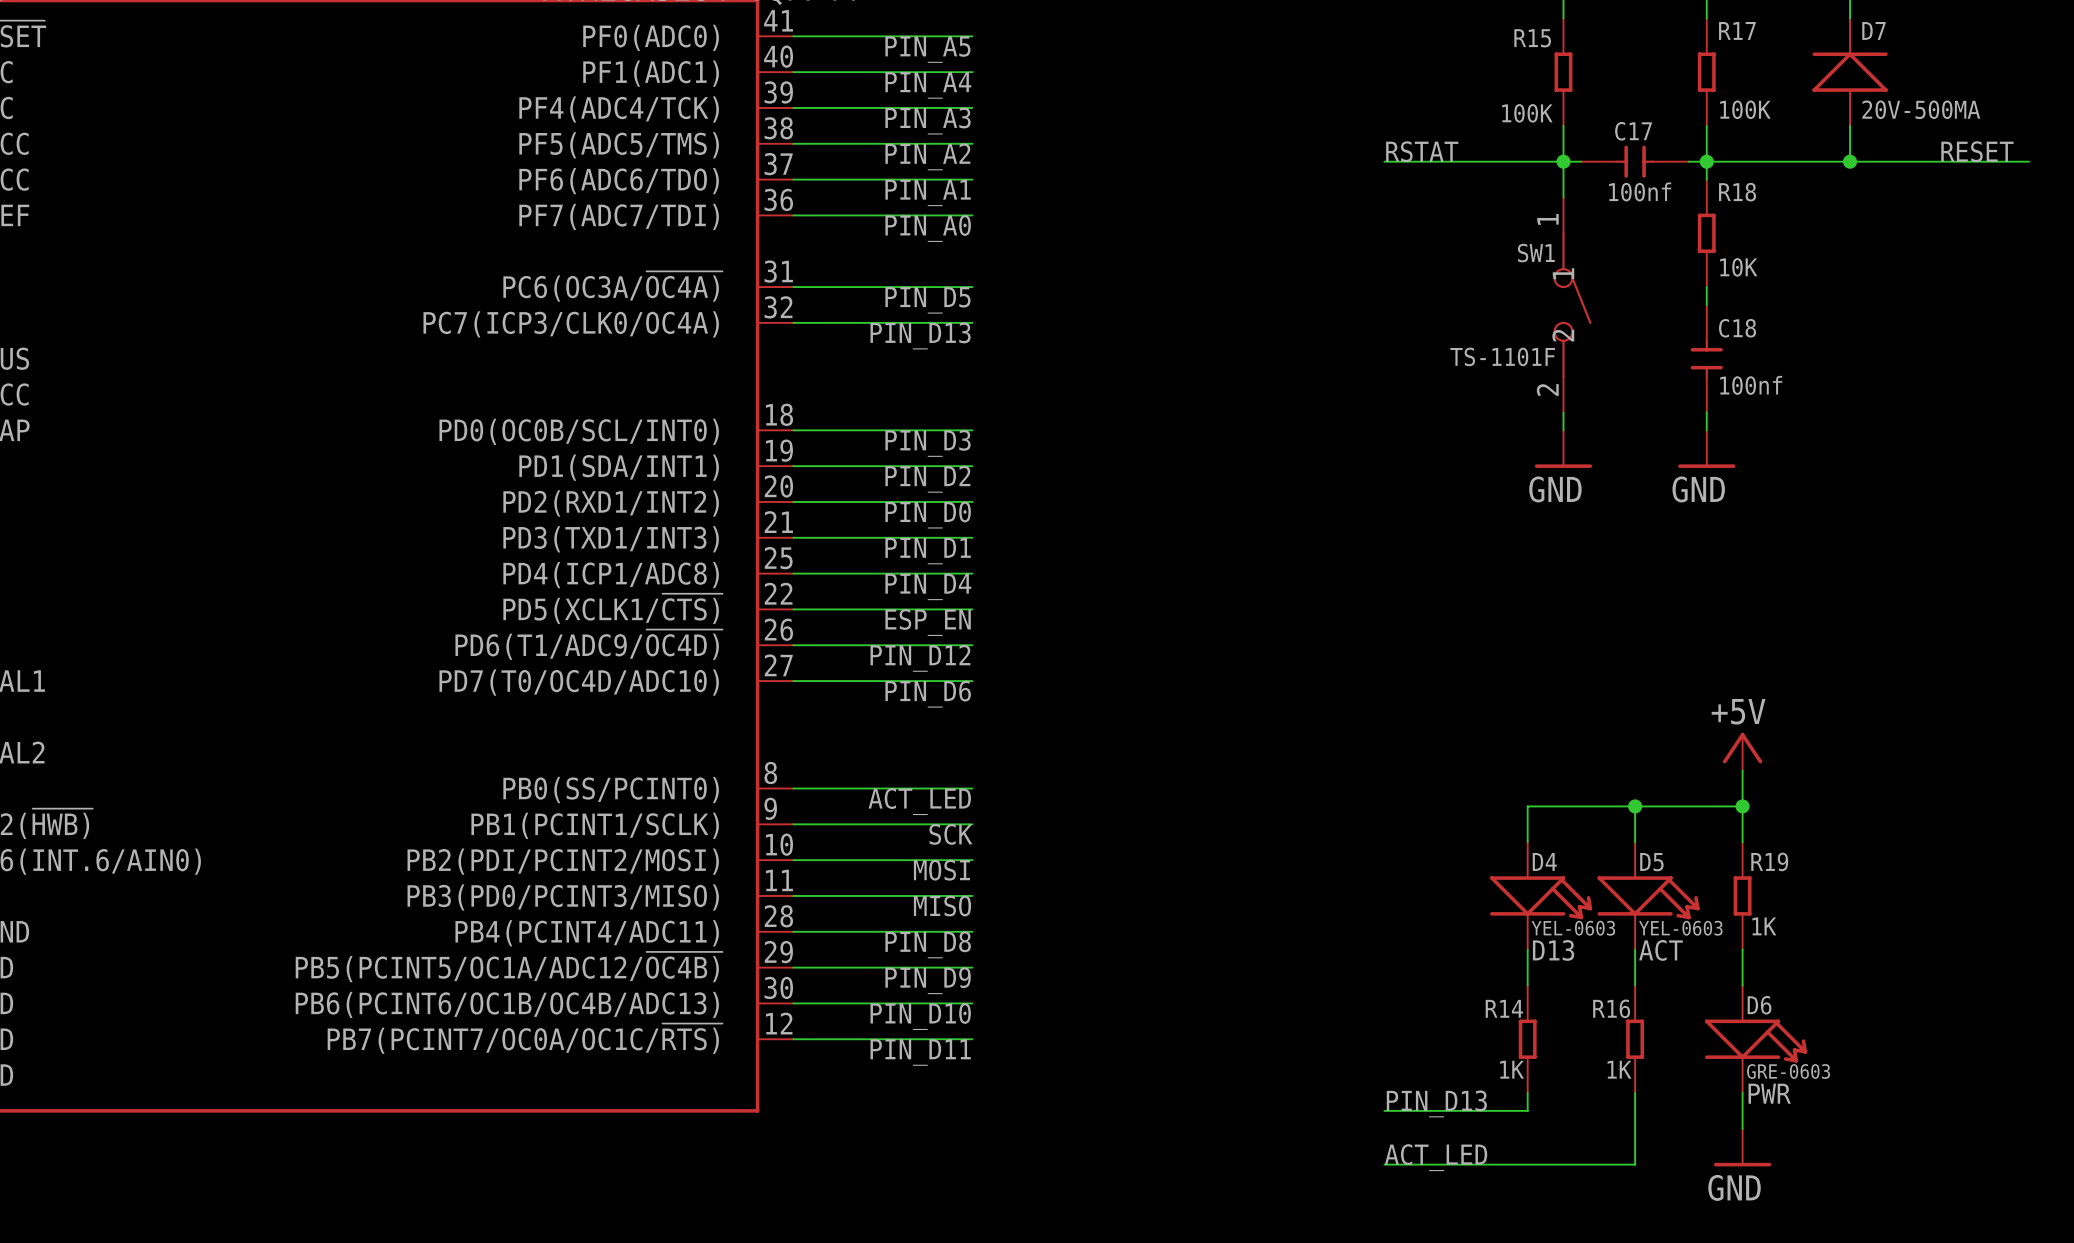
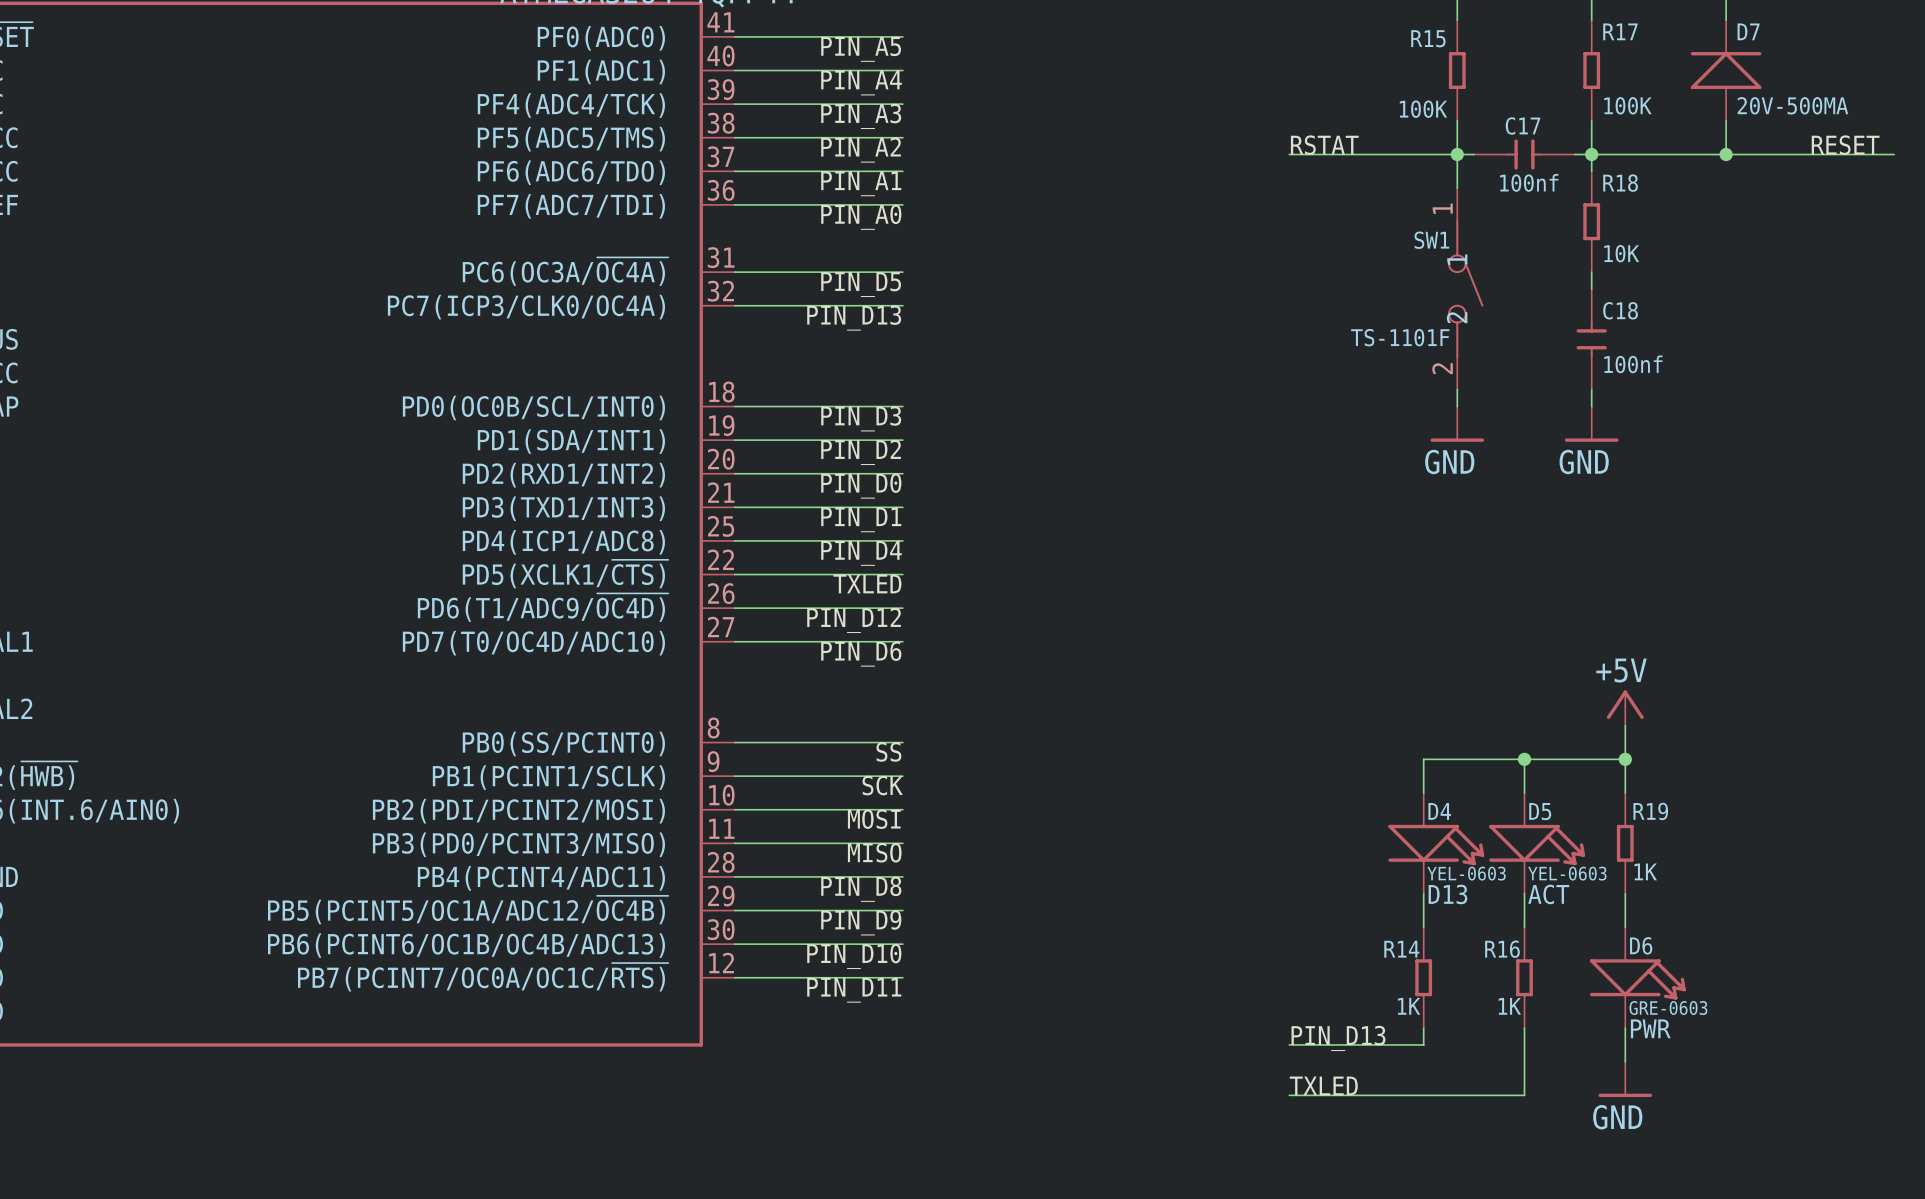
label: ESP_EN (928, 622) -> TXLED (867, 583)
label: ACT_LED (919, 801) -> SS (888, 751)
label: ACT_LED (1436, 1157) -> TXLED (1323, 1085)

